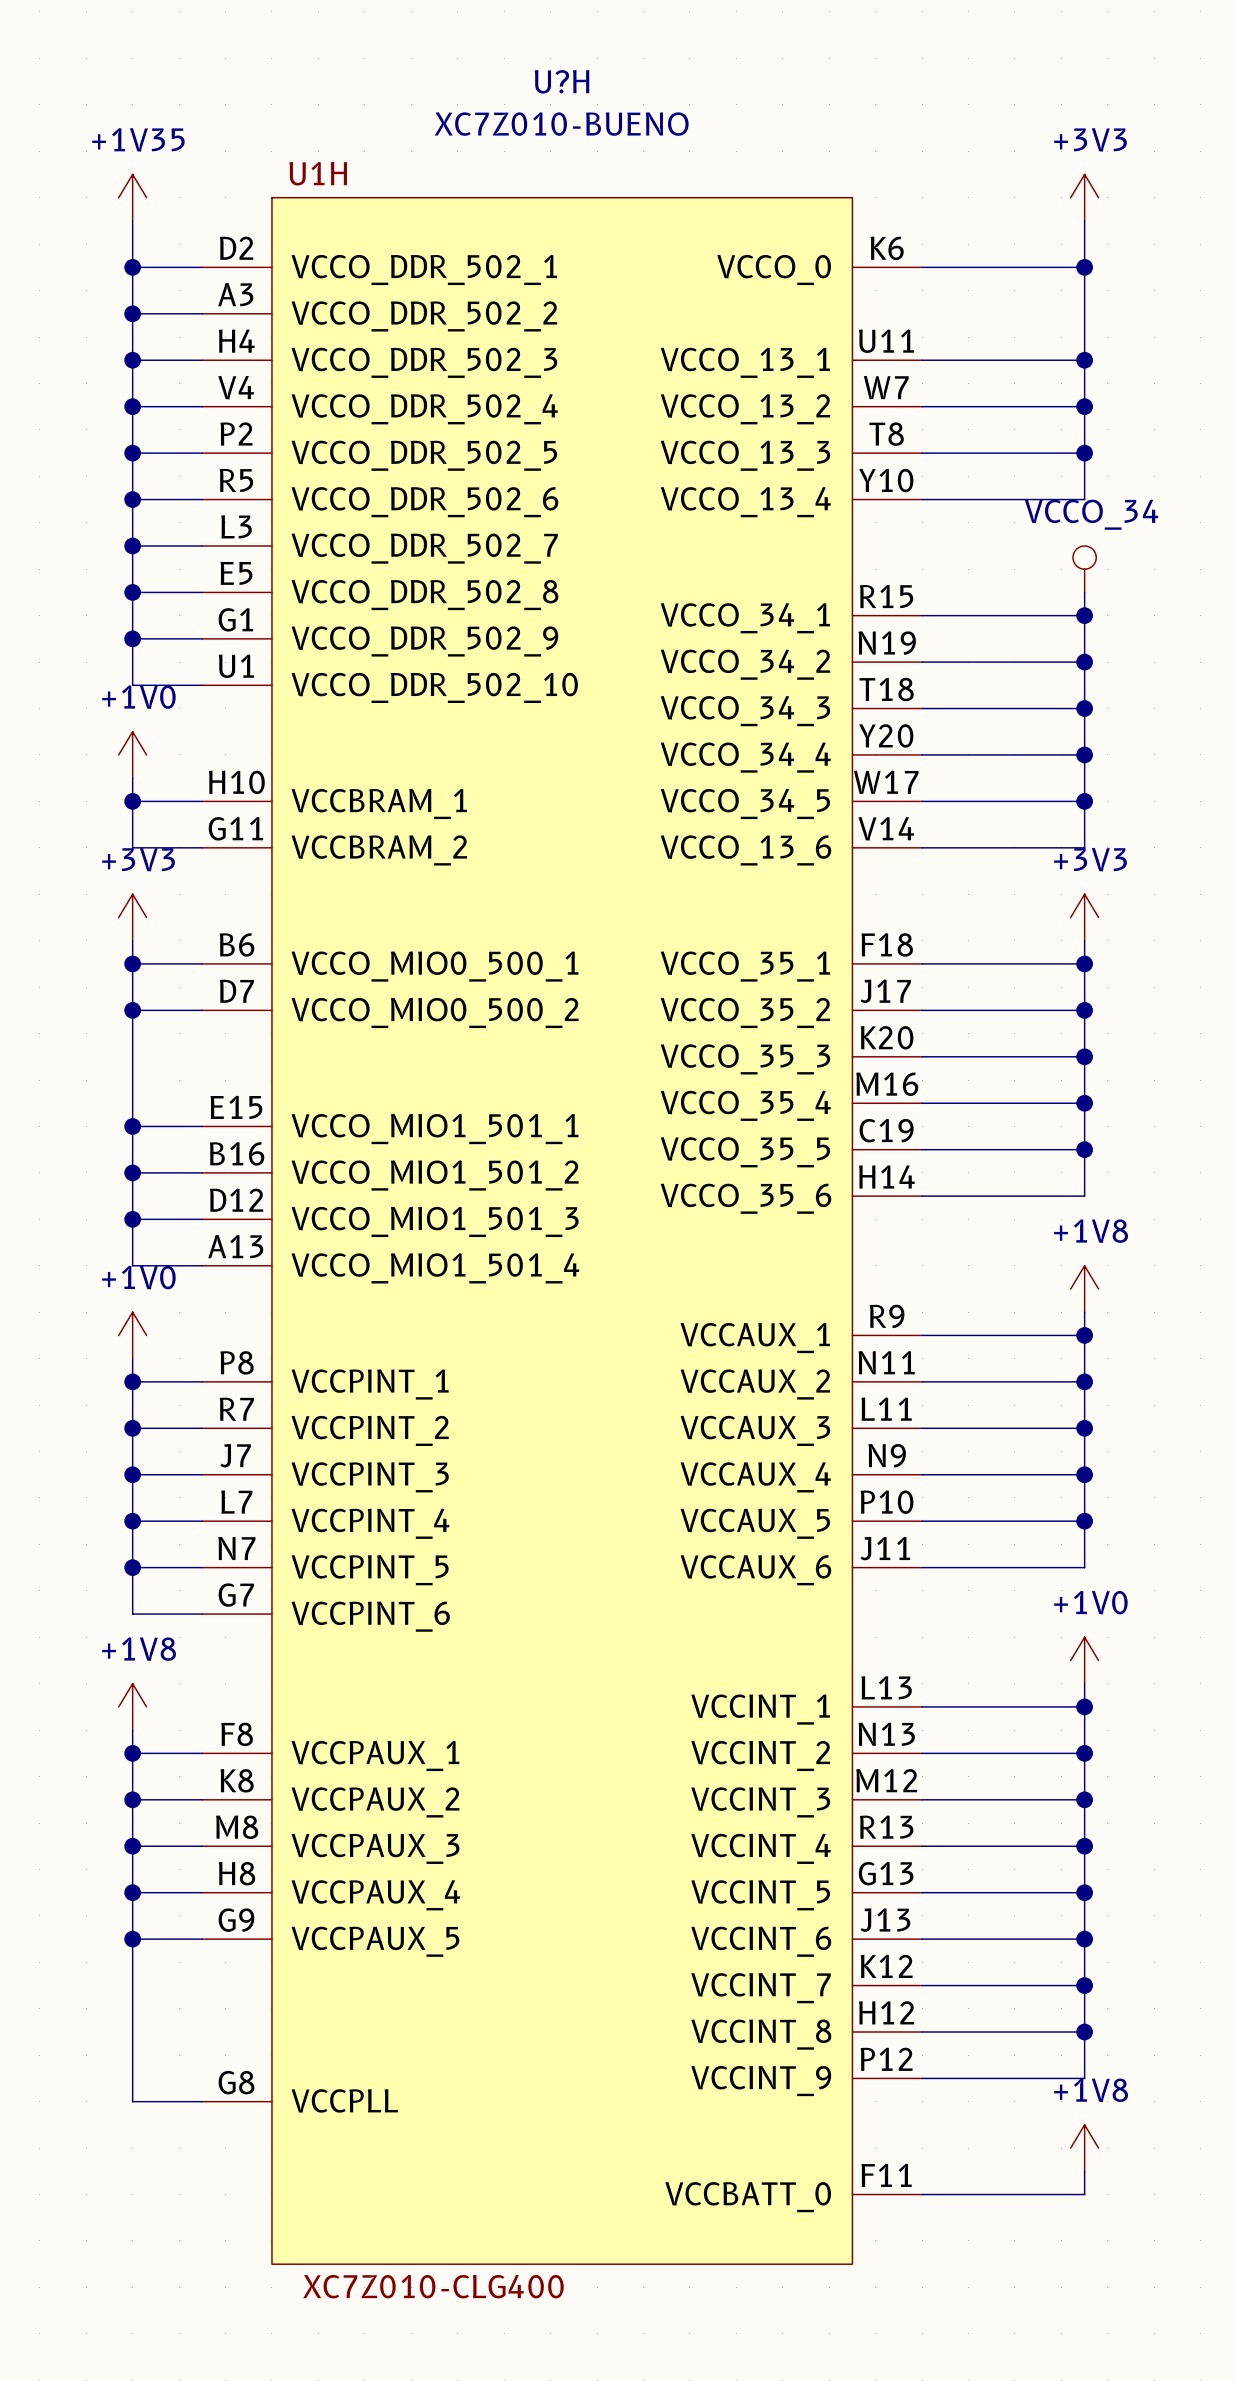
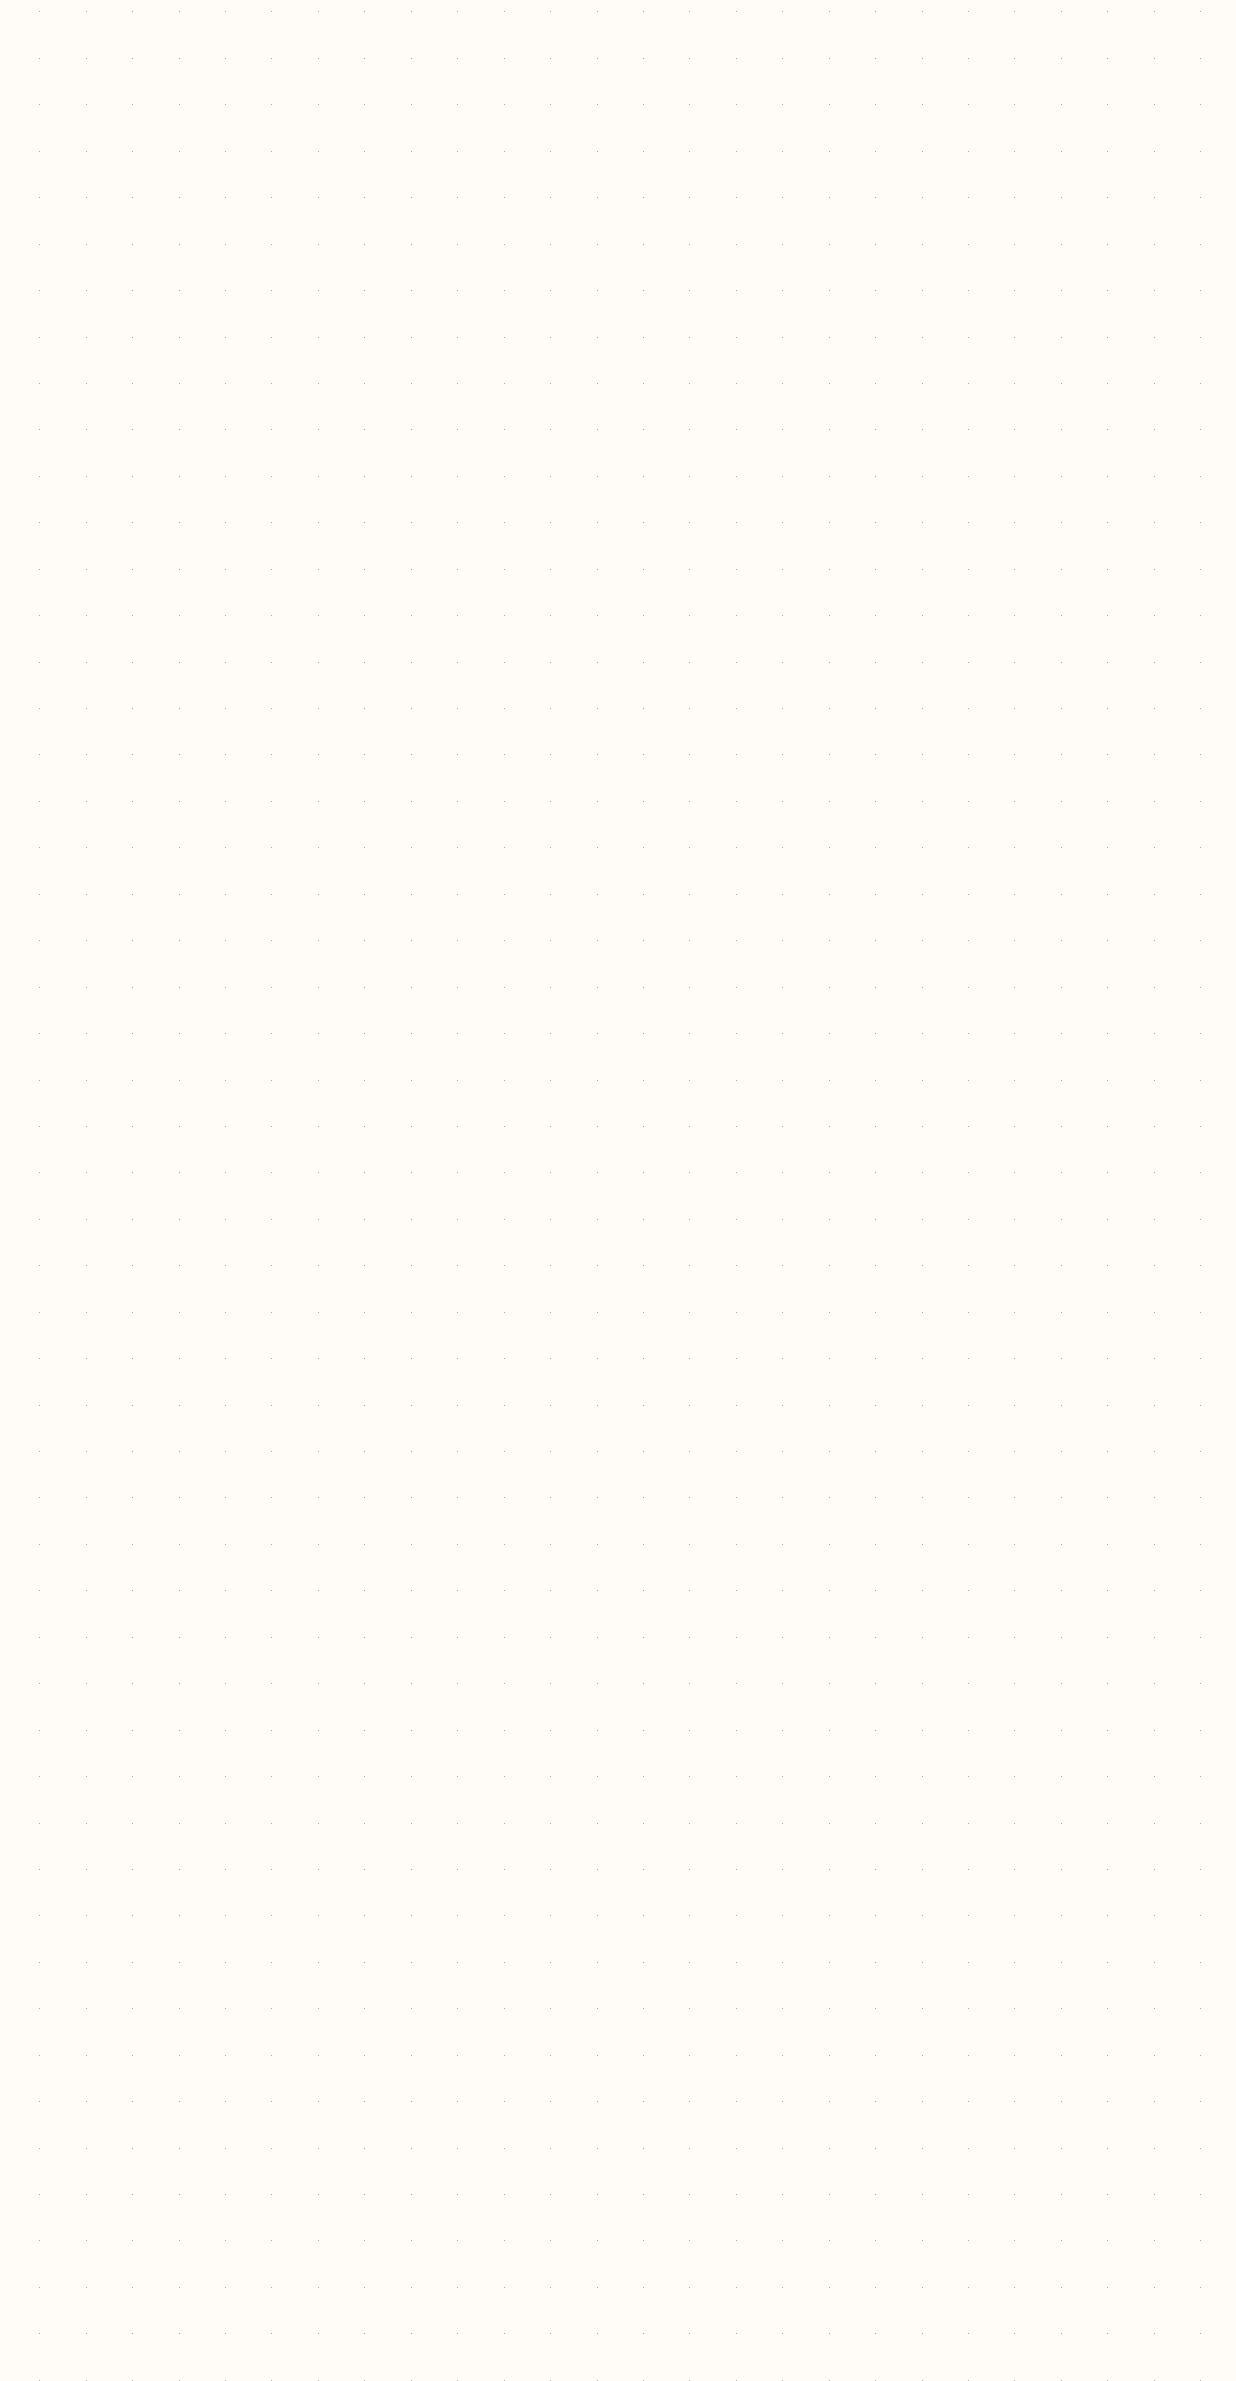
power symbol: +1V35 (132, 197) -> none
power symbol: +3V3 (1084, 197) -> none
wire: (132, 220) (132, 685) (202, 685) -> none
wire: (1084, 220) (1084, 499) (922, 499) -> none
wire: (132, 267) (202, 267) -> none
junction: (132, 267) -> none
wire: (922, 267) (1084, 267) -> none
junction: (1084, 267) -> none
wire: (132, 313) (202, 313) -> none
junction: (132, 313) -> none
wire: (132, 360) (202, 360) -> none
junction: (132, 360) -> none
wire: (922, 360) (1084, 360) -> none
junction: (1084, 360) -> none
wire: (132, 406) (202, 406) -> none
junction: (132, 406) -> none
wire: (922, 406) (1084, 406) -> none
junction: (1084, 406) -> none
wire: (132, 453) (202, 453) -> none
junction: (132, 453) -> none
wire: (922, 453) (1084, 453) -> none
junction: (1084, 453) -> none
wire: (132, 499) (202, 499) -> none
junction: (132, 499) -> none
wire: (132, 545) (202, 545) -> none
junction: (132, 545) -> none
power symbol: VCCO_34 (1084, 569) -> none
wire: (132, 592) (202, 592) -> none
junction: (132, 592) -> none
wire: (1084, 592) (1084, 847) (922, 847) -> none
wire: (922, 615) (1084, 615) -> none
junction: (1084, 615) -> none
wire: (132, 638) (202, 638) -> none
junction: (132, 638) -> none
wire: (922, 662) (1084, 662) -> none
junction: (1084, 662) -> none
wire: (922, 708) (1084, 708) -> none
junction: (1084, 708) -> none
power symbol: +1V0 (132, 754) -> none
wire: (922, 754) (1084, 754) -> none
junction: (1084, 754) -> none
wire: (132, 778) (132, 847) (202, 847) -> none
wire: (132, 801) (202, 801) -> none
junction: (132, 801) -> none
wire: (922, 801) (1084, 801) -> none
junction: (1084, 801) -> none
power symbol: +3V3 (132, 917) -> none
power symbol: +3V3 (1084, 917) -> none
wire: (132, 940) (132, 1265) (202, 1265) -> none
wire: (1084, 940) (1084, 1196) (922, 1196) -> none
wire: (132, 963) (202, 963) -> none
junction: (132, 963) -> none
wire: (922, 963) (1084, 963) -> none
junction: (1084, 963) -> none
wire: (132, 1010) (202, 1010) -> none
junction: (132, 1010) -> none
wire: (922, 1010) (1084, 1010) -> none
junction: (1084, 1010) -> none
wire: (922, 1056) (1084, 1056) -> none
junction: (1084, 1056) -> none
wire: (922, 1103) (1084, 1103) -> none
junction: (1084, 1103) -> none
wire: (132, 1126) (202, 1126) -> none
junction: (132, 1126) -> none
wire: (922, 1149) (1084, 1149) -> none
junction: (1084, 1149) -> none
wire: (132, 1172) (202, 1172) -> none
junction: (132, 1172) -> none
wire: (132, 1219) (202, 1219) -> none
junction: (132, 1219) -> none
U?H: XC7Z010-BUENO (562, 1230) -> none
power symbol: +1V8 (1084, 1288) -> none
wire: (1084, 1312) (1084, 1567) (922, 1567) -> none
power symbol: +1V0 (132, 1335) -> none
wire: (922, 1335) (1084, 1335) -> none
junction: (1084, 1335) -> none
wire: (132, 1358) (132, 1614) (202, 1614) -> none
wire: (132, 1381) (202, 1381) -> none
junction: (132, 1381) -> none
wire: (922, 1381) (1084, 1381) -> none
junction: (1084, 1381) -> none
wire: (132, 1428) (202, 1428) -> none
junction: (132, 1428) -> none
wire: (922, 1428) (1084, 1428) -> none
junction: (1084, 1428) -> none
wire: (132, 1474) (202, 1474) -> none
junction: (132, 1474) -> none
wire: (922, 1474) (1084, 1474) -> none
junction: (1084, 1474) -> none
wire: (132, 1521) (202, 1521) -> none
junction: (132, 1521) -> none
wire: (922, 1521) (1084, 1521) -> none
junction: (1084, 1521) -> none
wire: (132, 1567) (202, 1567) -> none
junction: (132, 1567) -> none
power symbol: +1V0 (1084, 1660) -> none
wire: (1084, 1683) (1084, 2078) (922, 2078) -> none
power symbol: +1V8 (132, 1706) -> none
wire: (922, 1706) (1084, 1706) -> none
junction: (1084, 1706) -> none
wire: (132, 1730) (132, 2101) (202, 2101) -> none
wire: (132, 1753) (202, 1753) -> none
junction: (132, 1753) -> none
wire: (922, 1753) (1084, 1753) -> none
junction: (1084, 1753) -> none
wire: (132, 1799) (202, 1799) -> none
junction: (132, 1799) -> none
wire: (922, 1799) (1084, 1799) -> none
junction: (1084, 1799) -> none
wire: (132, 1846) (202, 1846) -> none
junction: (132, 1846) -> none
wire: (922, 1846) (1084, 1846) -> none
junction: (1084, 1846) -> none
wire: (132, 1892) (202, 1892) -> none
junction: (132, 1892) -> none
wire: (922, 1892) (1084, 1892) -> none
junction: (1084, 1892) -> none
wire: (132, 1939) (202, 1939) -> none
junction: (132, 1939) -> none
wire: (922, 1939) (1084, 1939) -> none
junction: (1084, 1939) -> none
wire: (922, 1985) (1084, 1985) -> none
junction: (1084, 1985) -> none
wire: (922, 2032) (1084, 2032) -> none
junction: (1084, 2032) -> none
power symbol: +1V8 (1084, 2148) -> none
wire: (1084, 2171) (1084, 2194) (922, 2194) -> none

